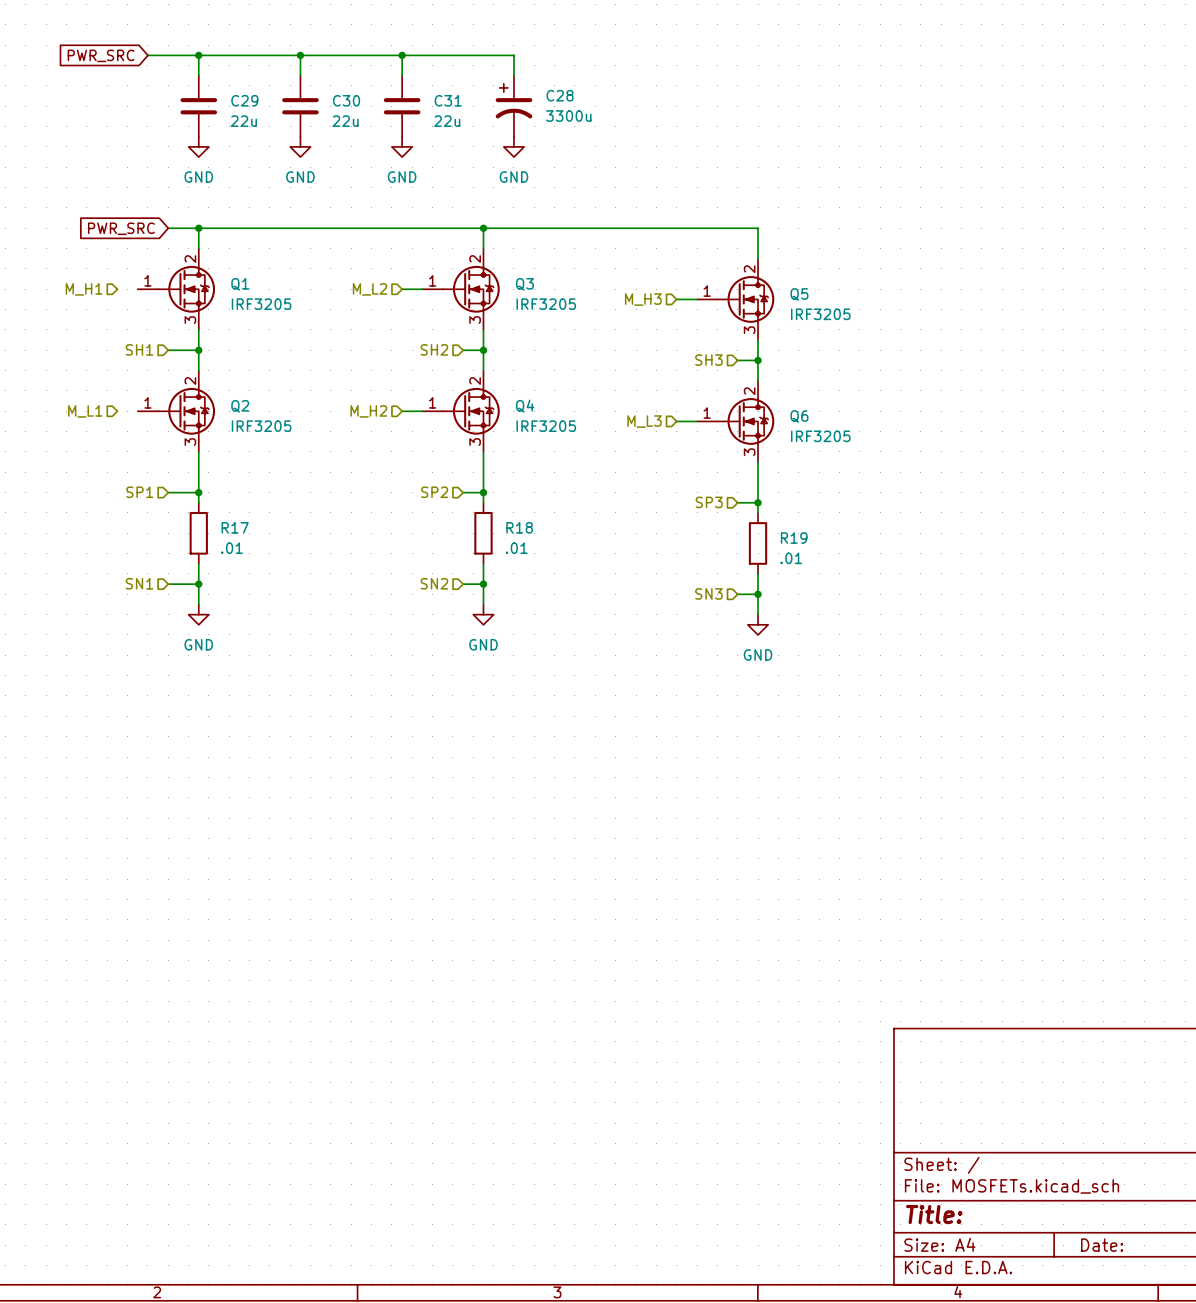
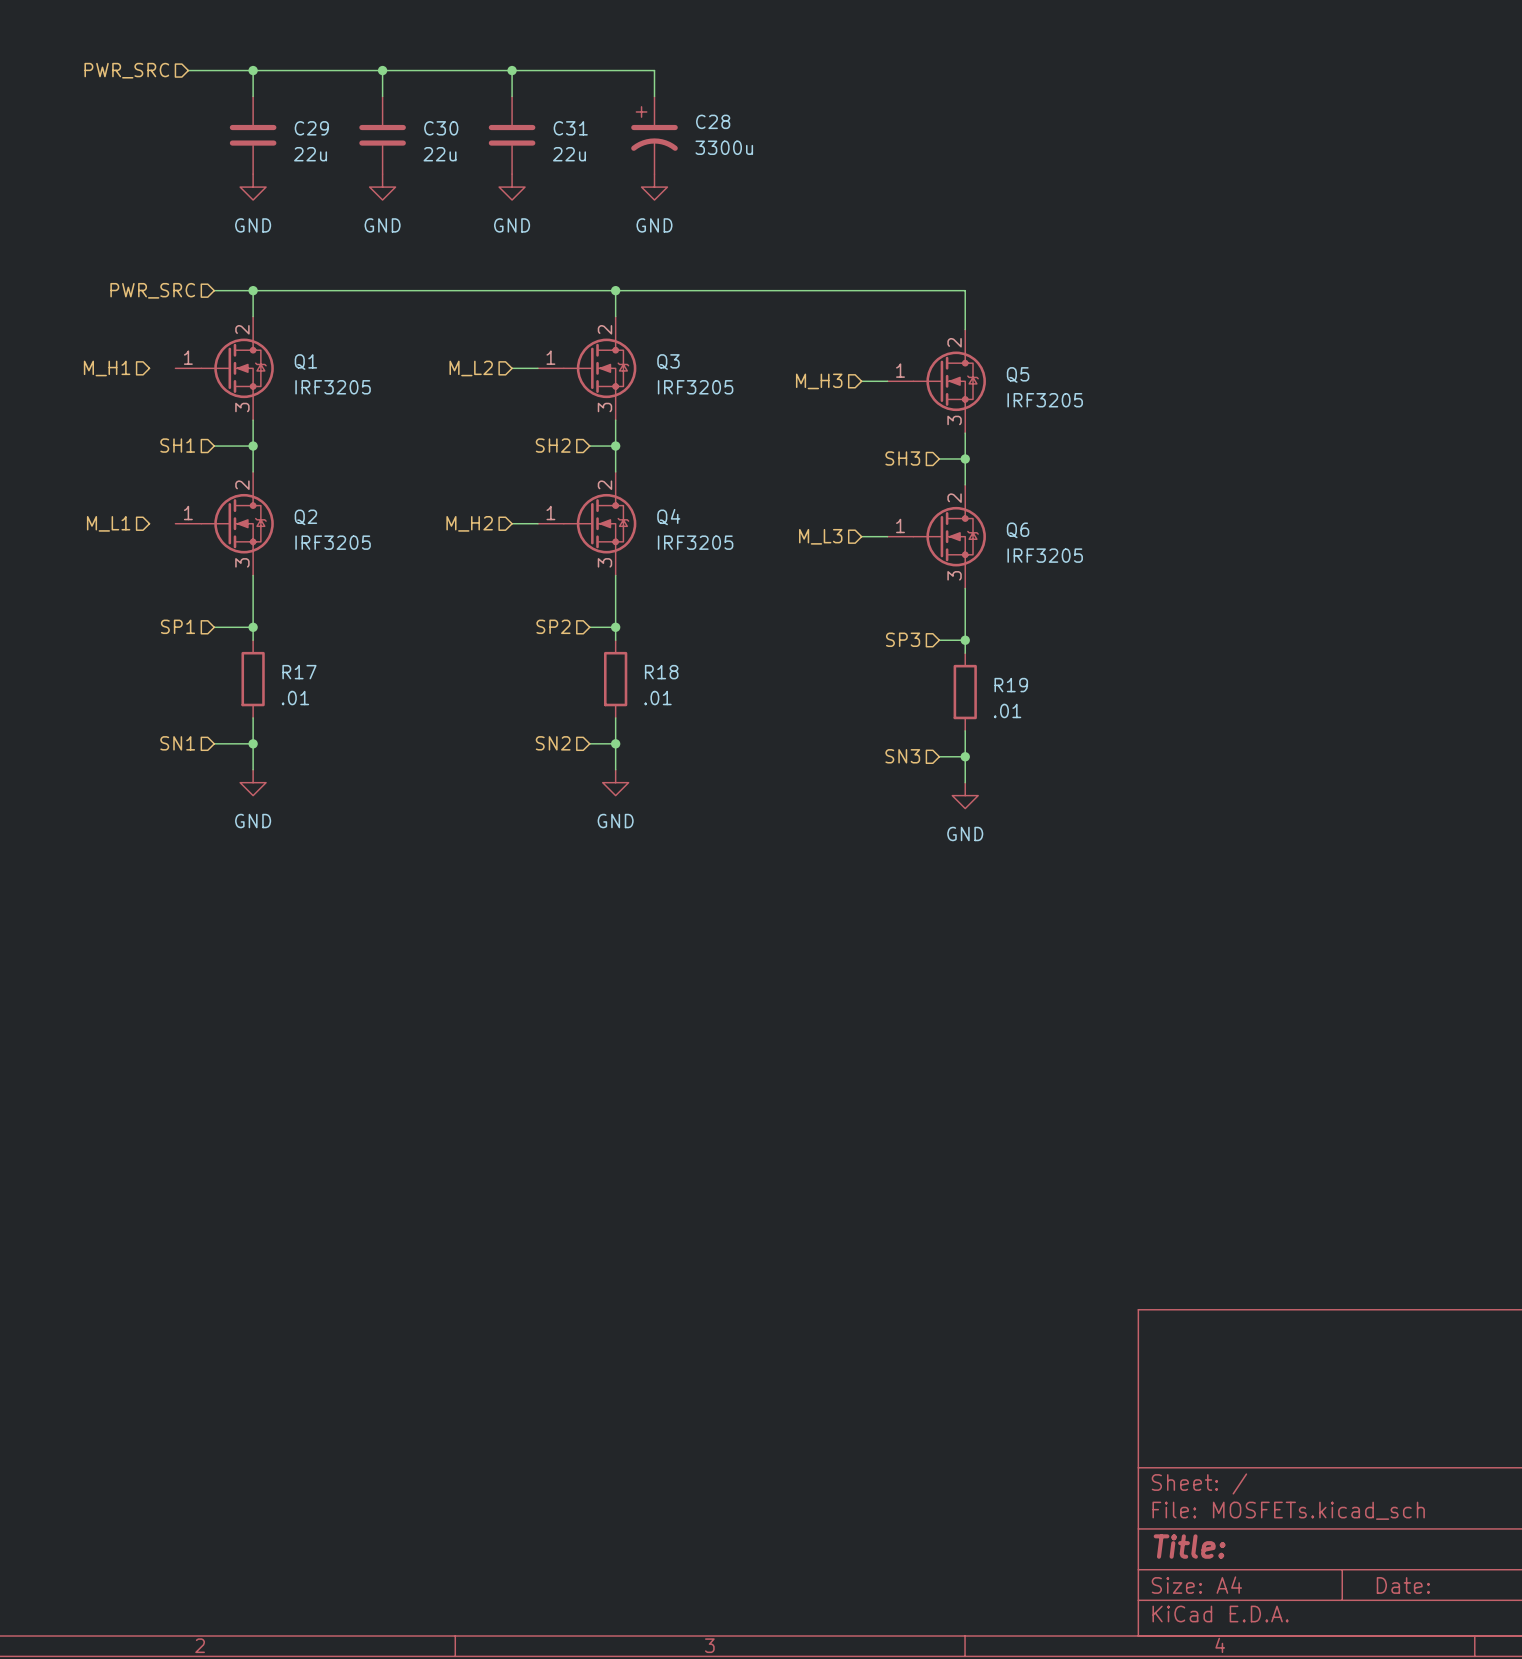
hierarchical label: none -> PWR_SRC (126, 70)
global label: PWR_SRC (101, 55) -> none
hierarchical label: none -> PWR_SRC (152, 290)
global label: PWR_SRC (121, 228) -> none

